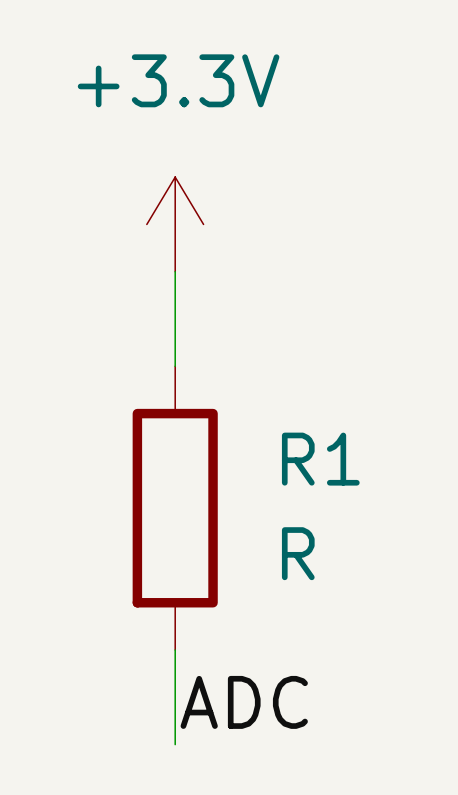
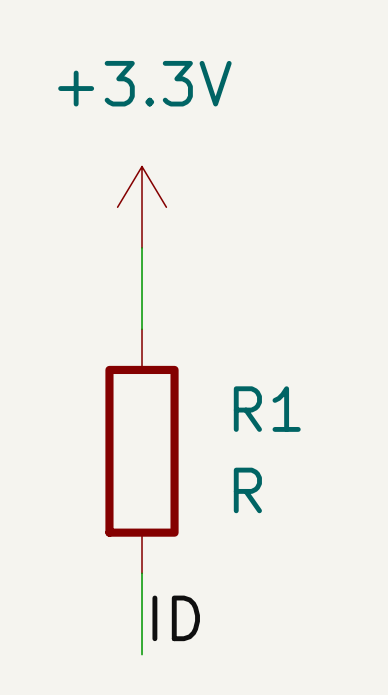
label: ADC (244, 702) -> ID (176, 618)

